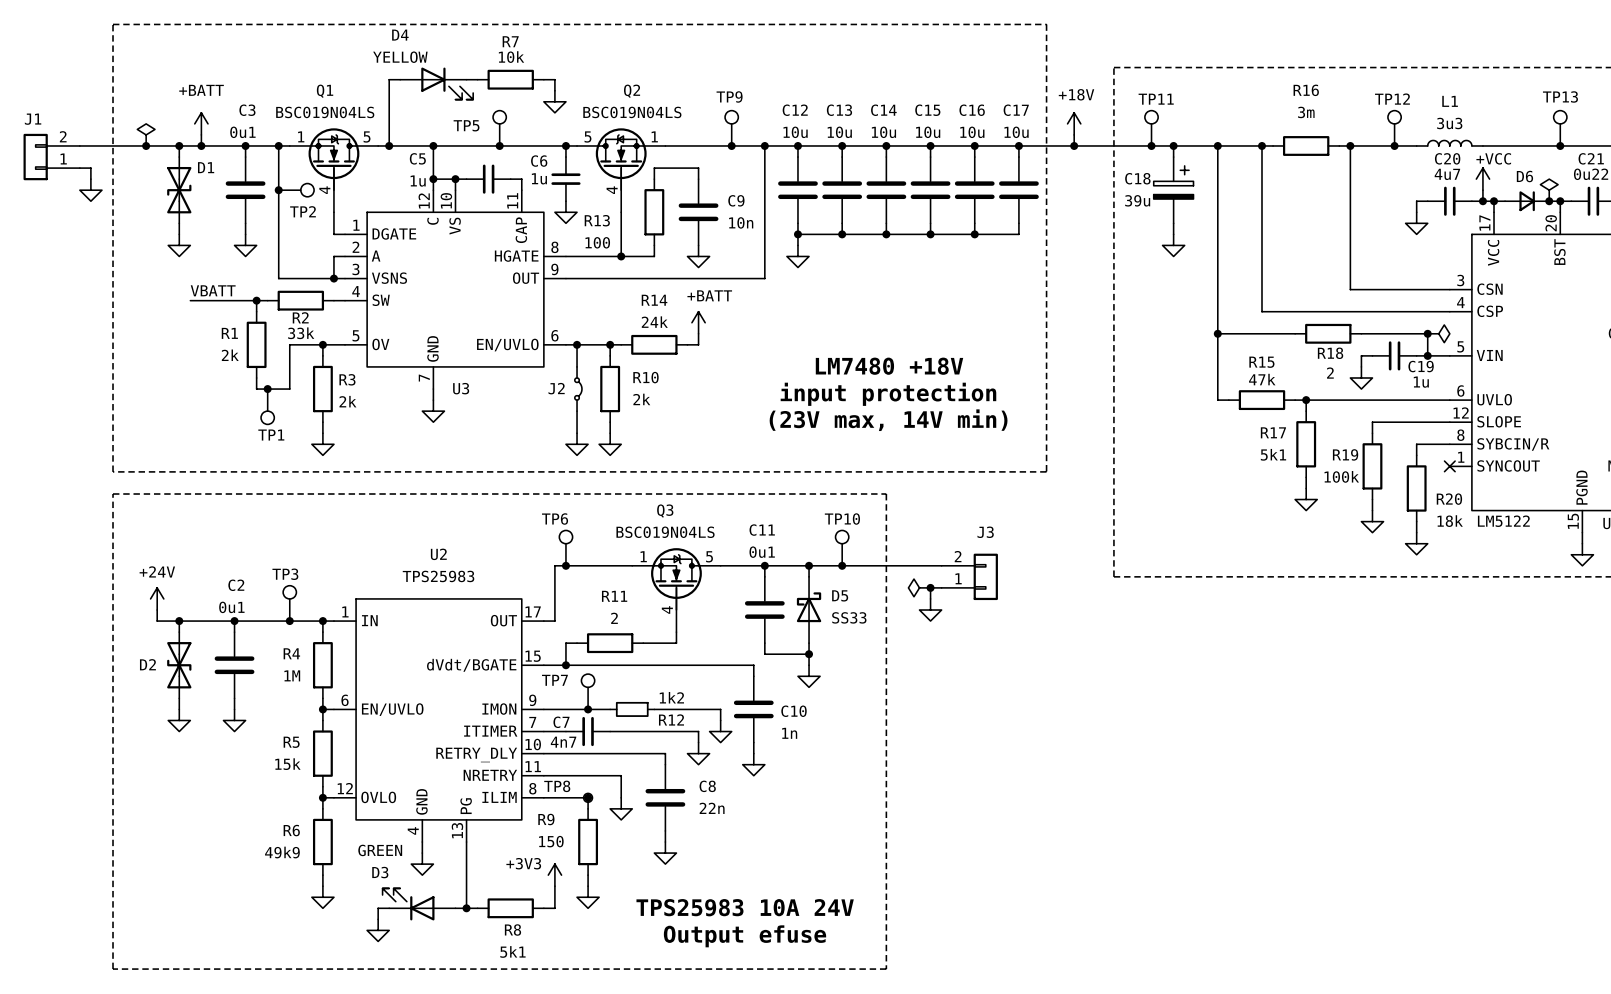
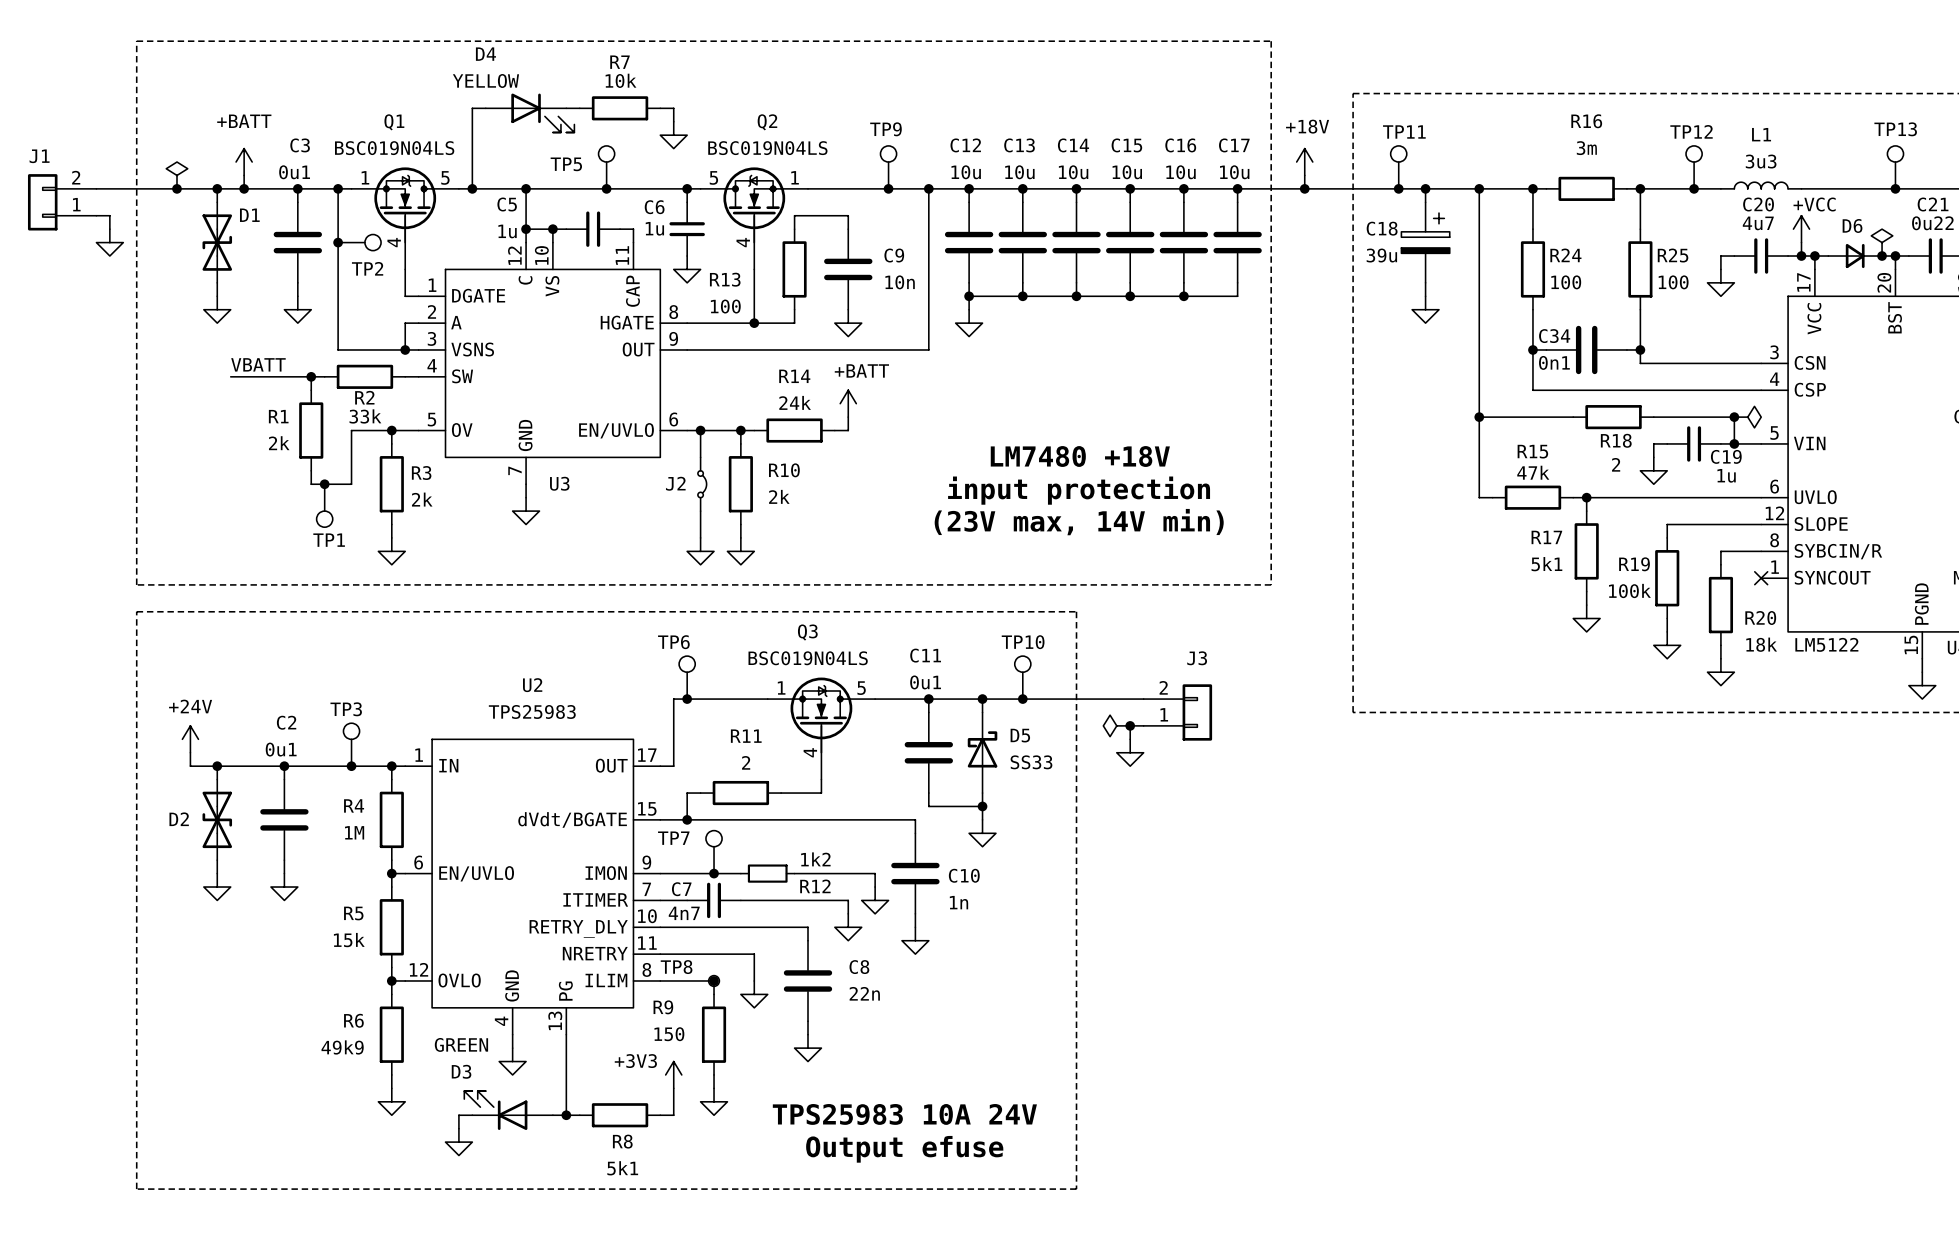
wire: (1261, 179) (1261, 245) -> none
wire: (1350, 179) (1350, 245) -> none
R24: none -> 100 (1532, 269)
R25: none -> 100 (1640, 269)
wire: none -> (1532, 349) (1546, 349)
junction: none -> (1532, 349)
C34: none -> 0n1 (1586, 349)
wire: none -> (1626, 349) (1640, 349)
junction: none -> (1640, 349)

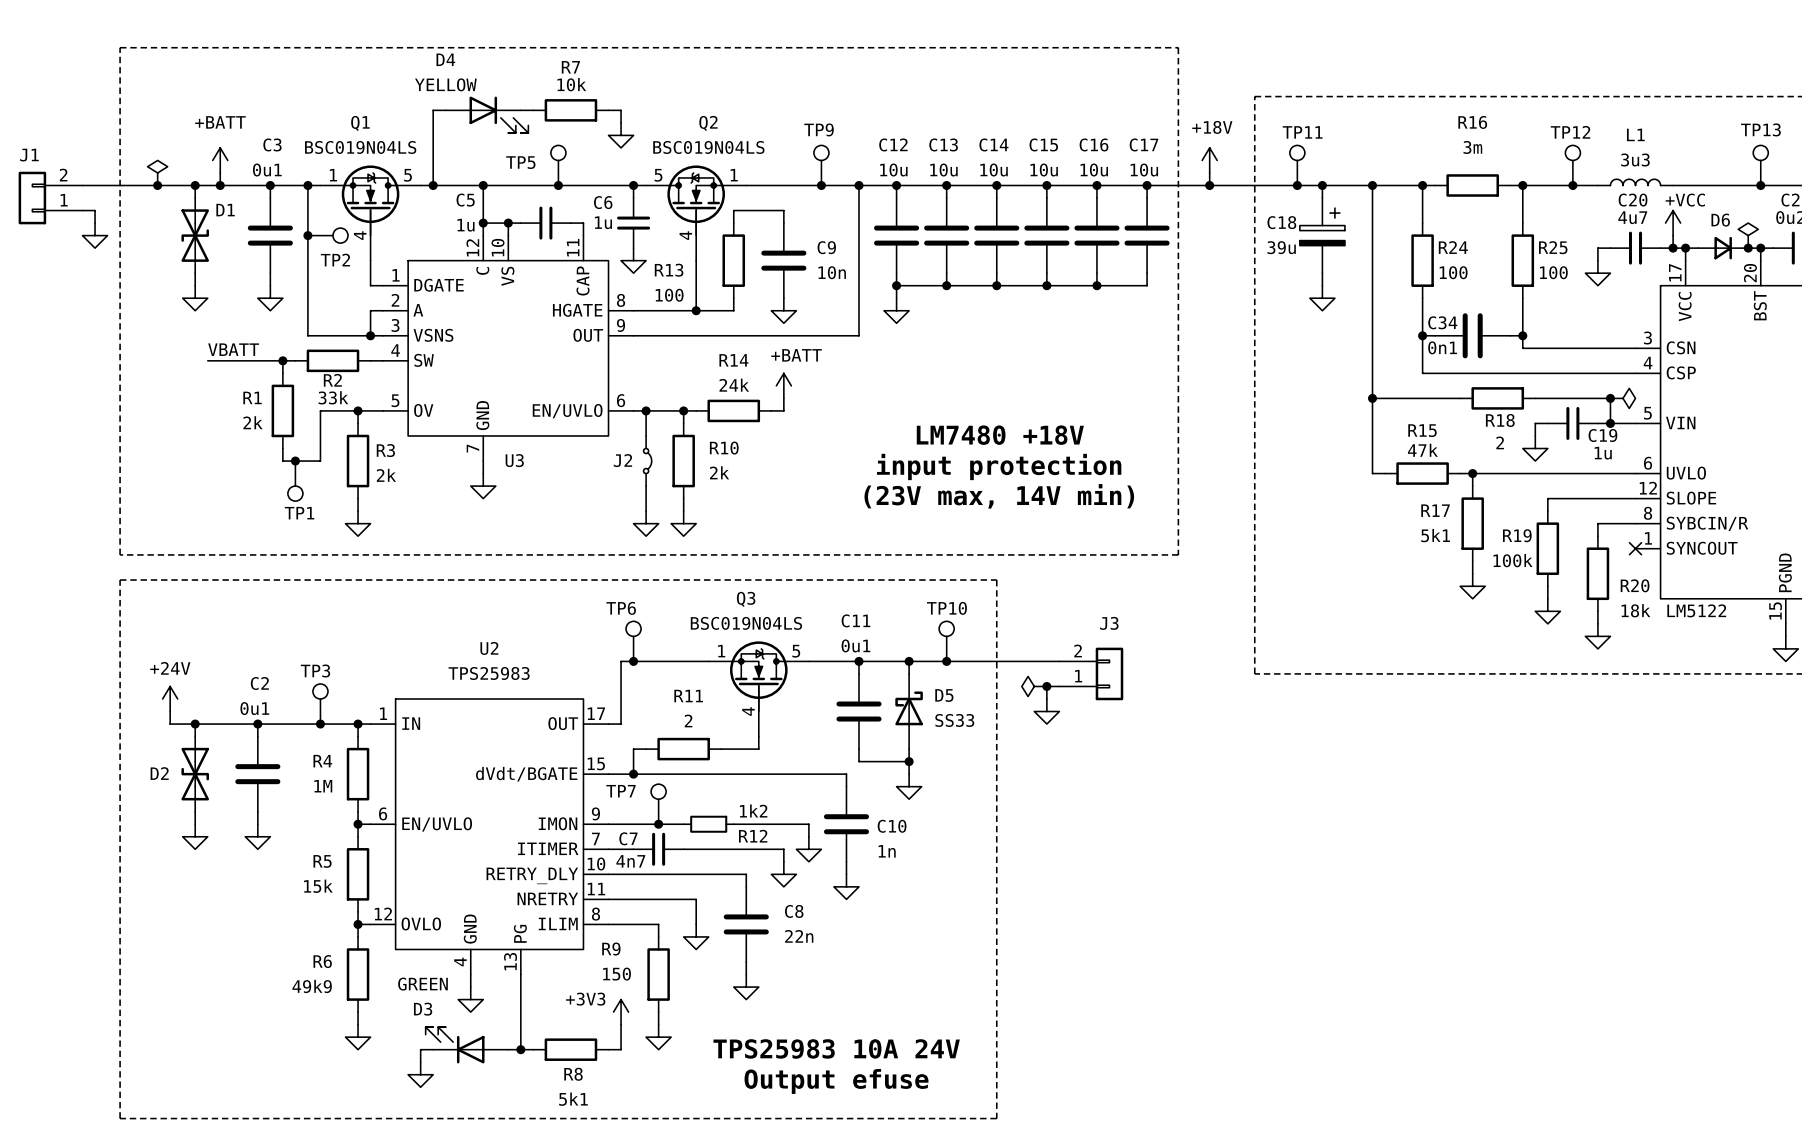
junction: (714, 980) -> none
TP8: (714, 980) -> none

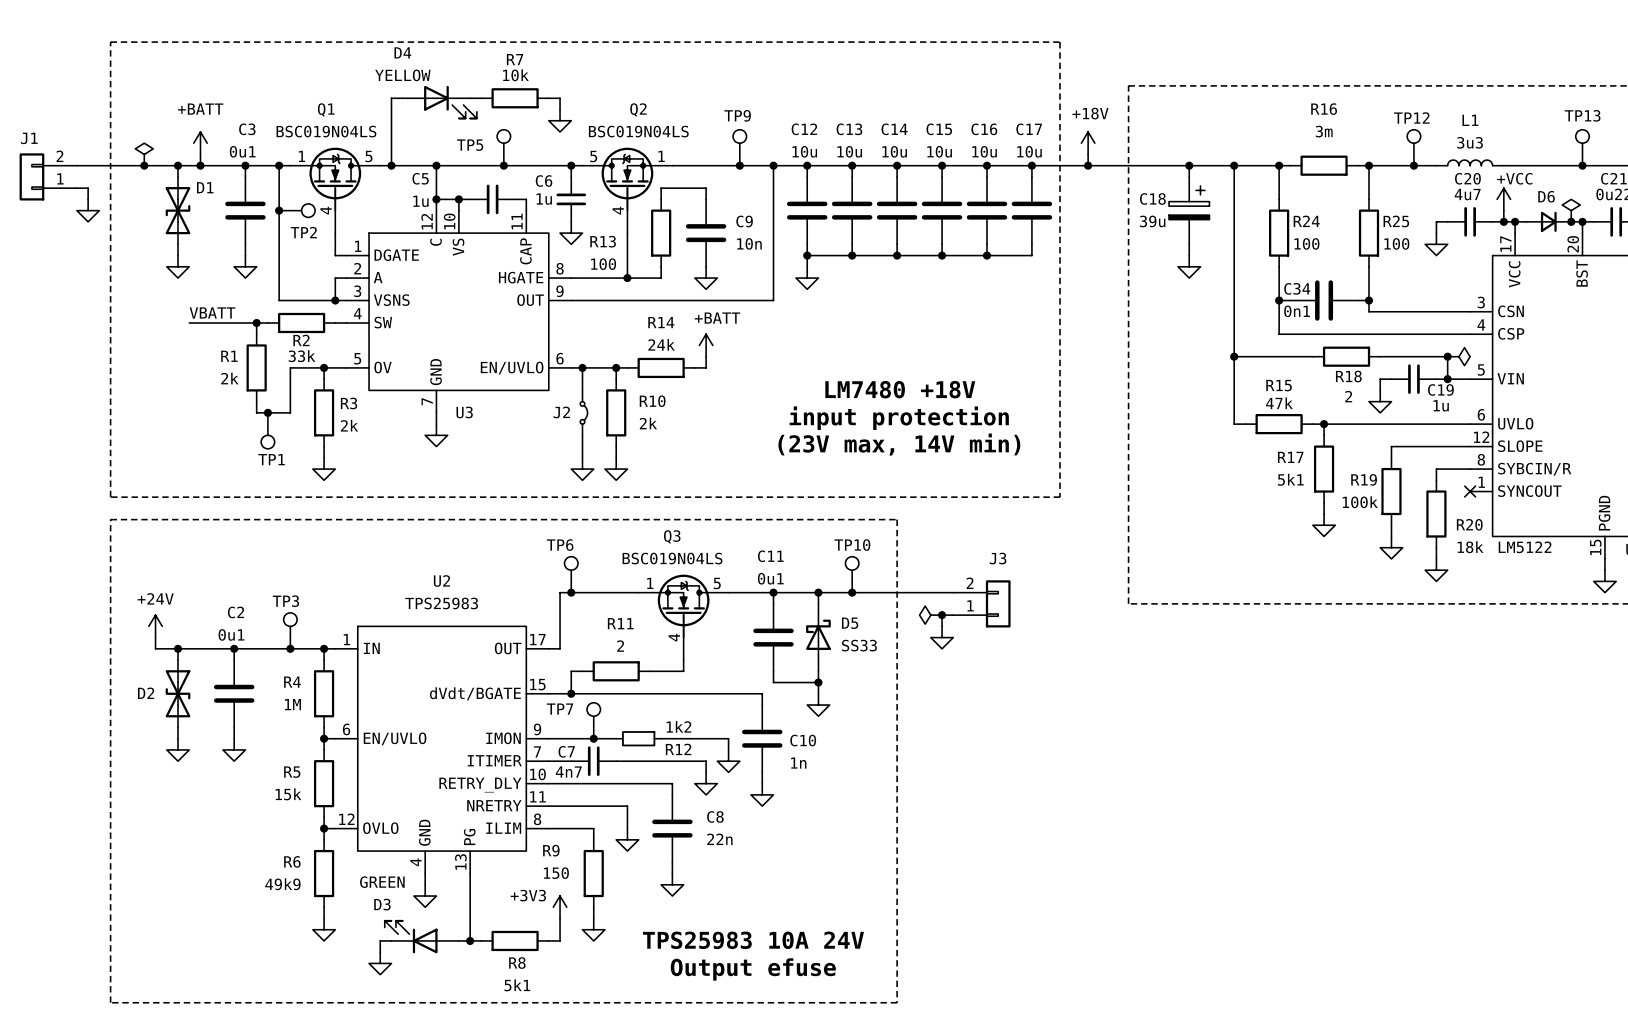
TP11: (1297, 165) -> none
junction: (1297, 185) -> none

